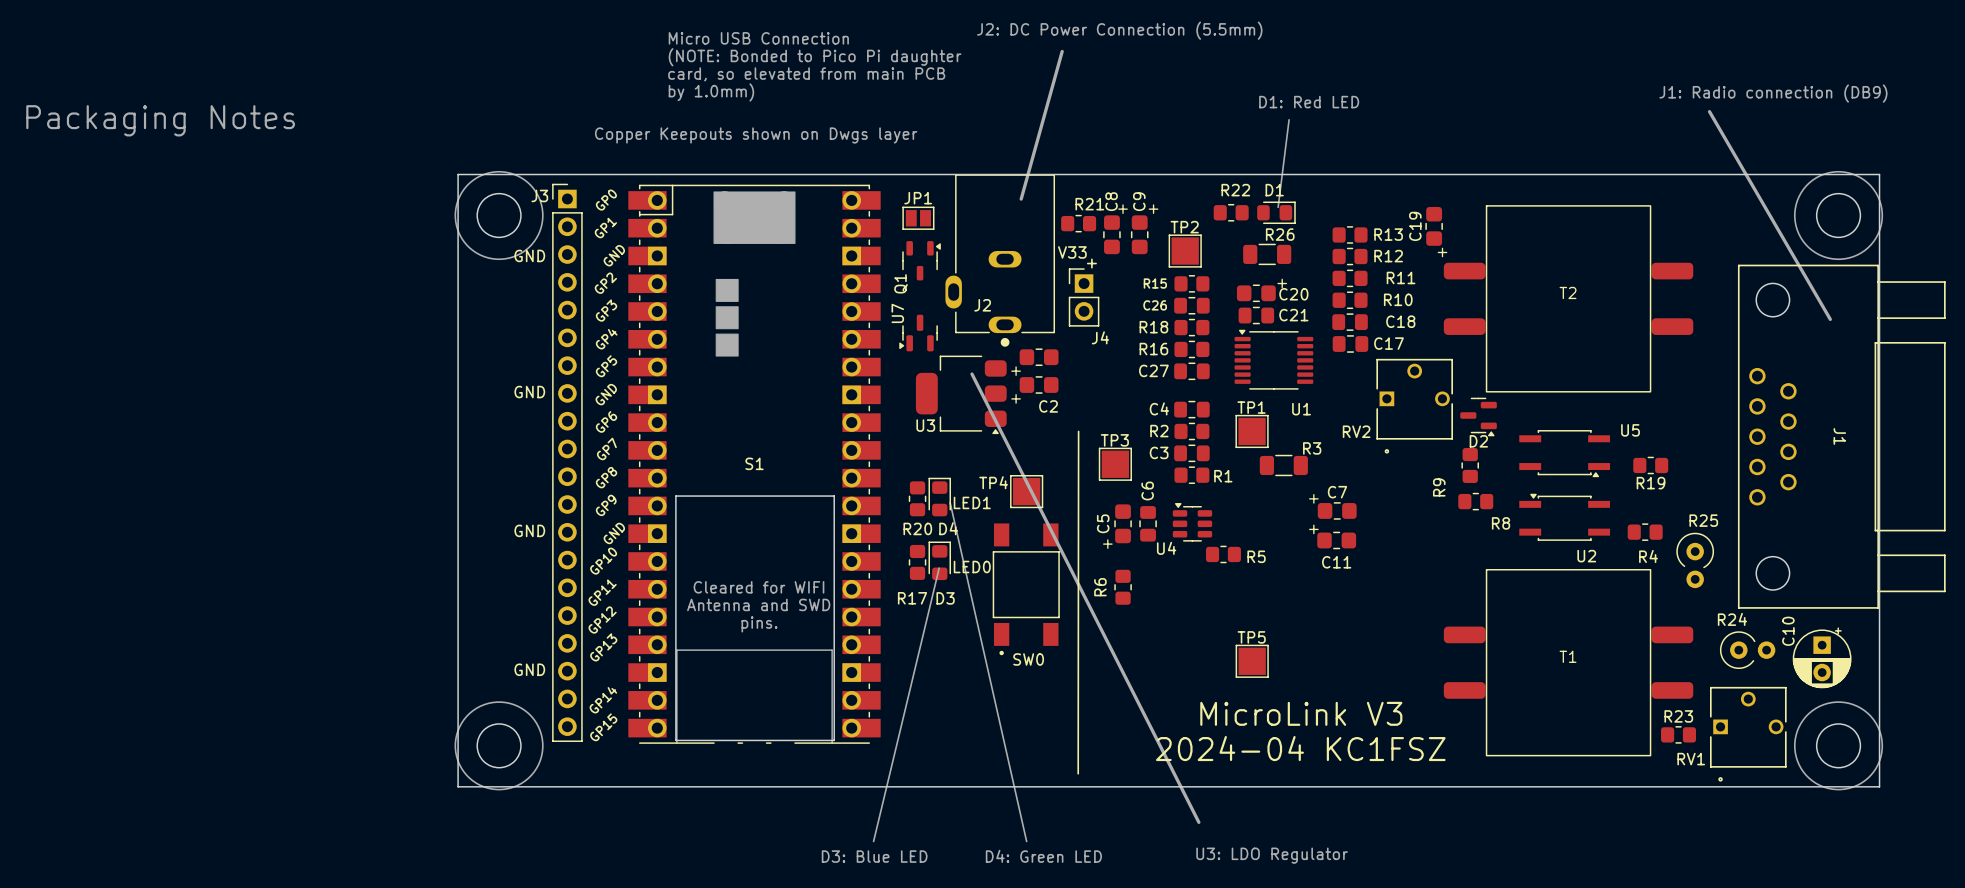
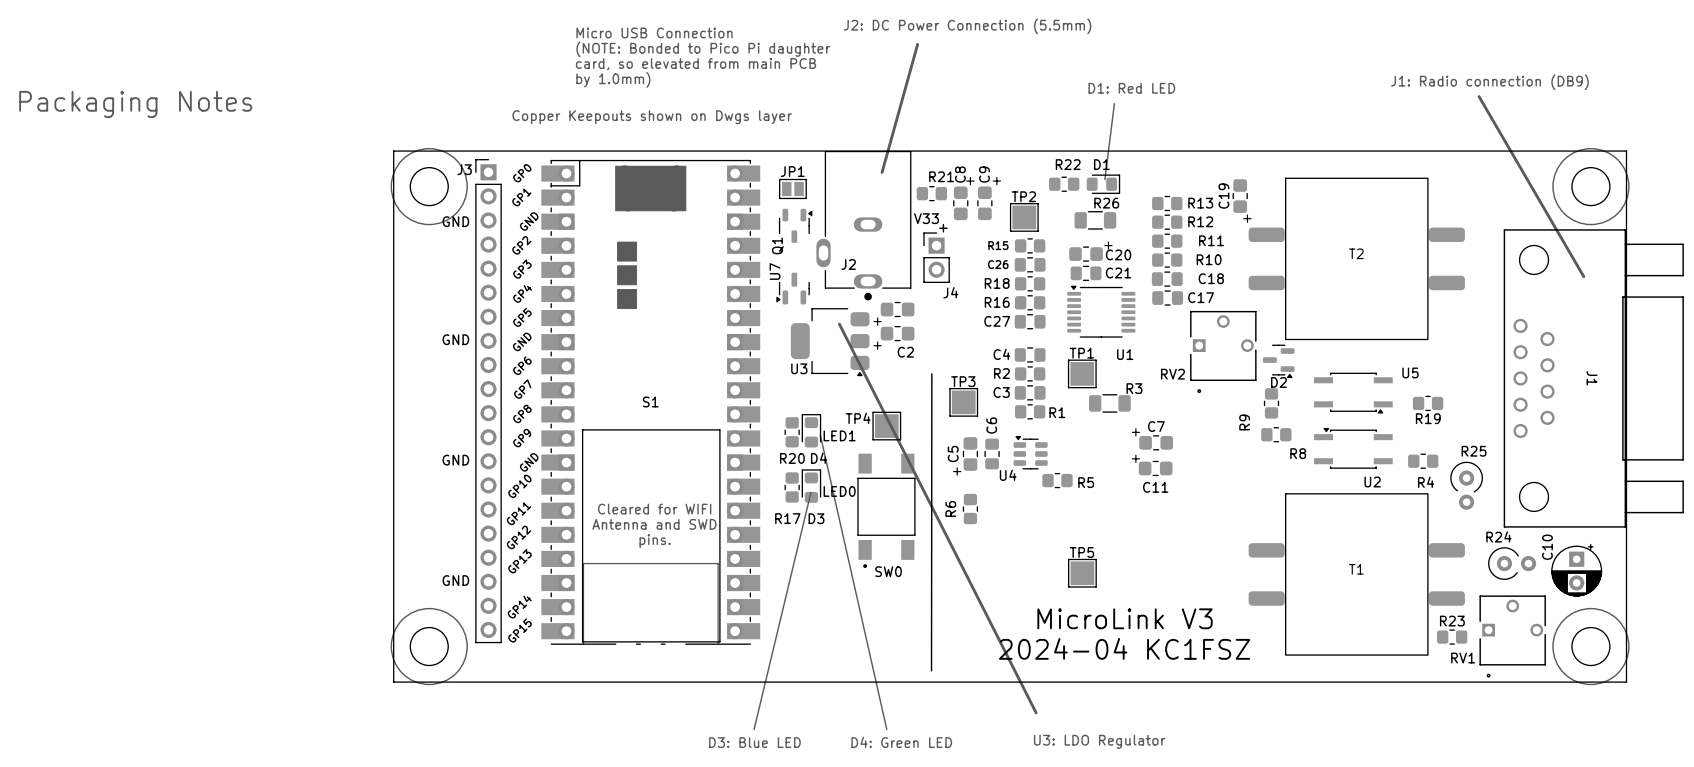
text position: J1: Radio connection (DB9) (1773, 93) -> J1: Radio connection (DB9) (1489, 82)

